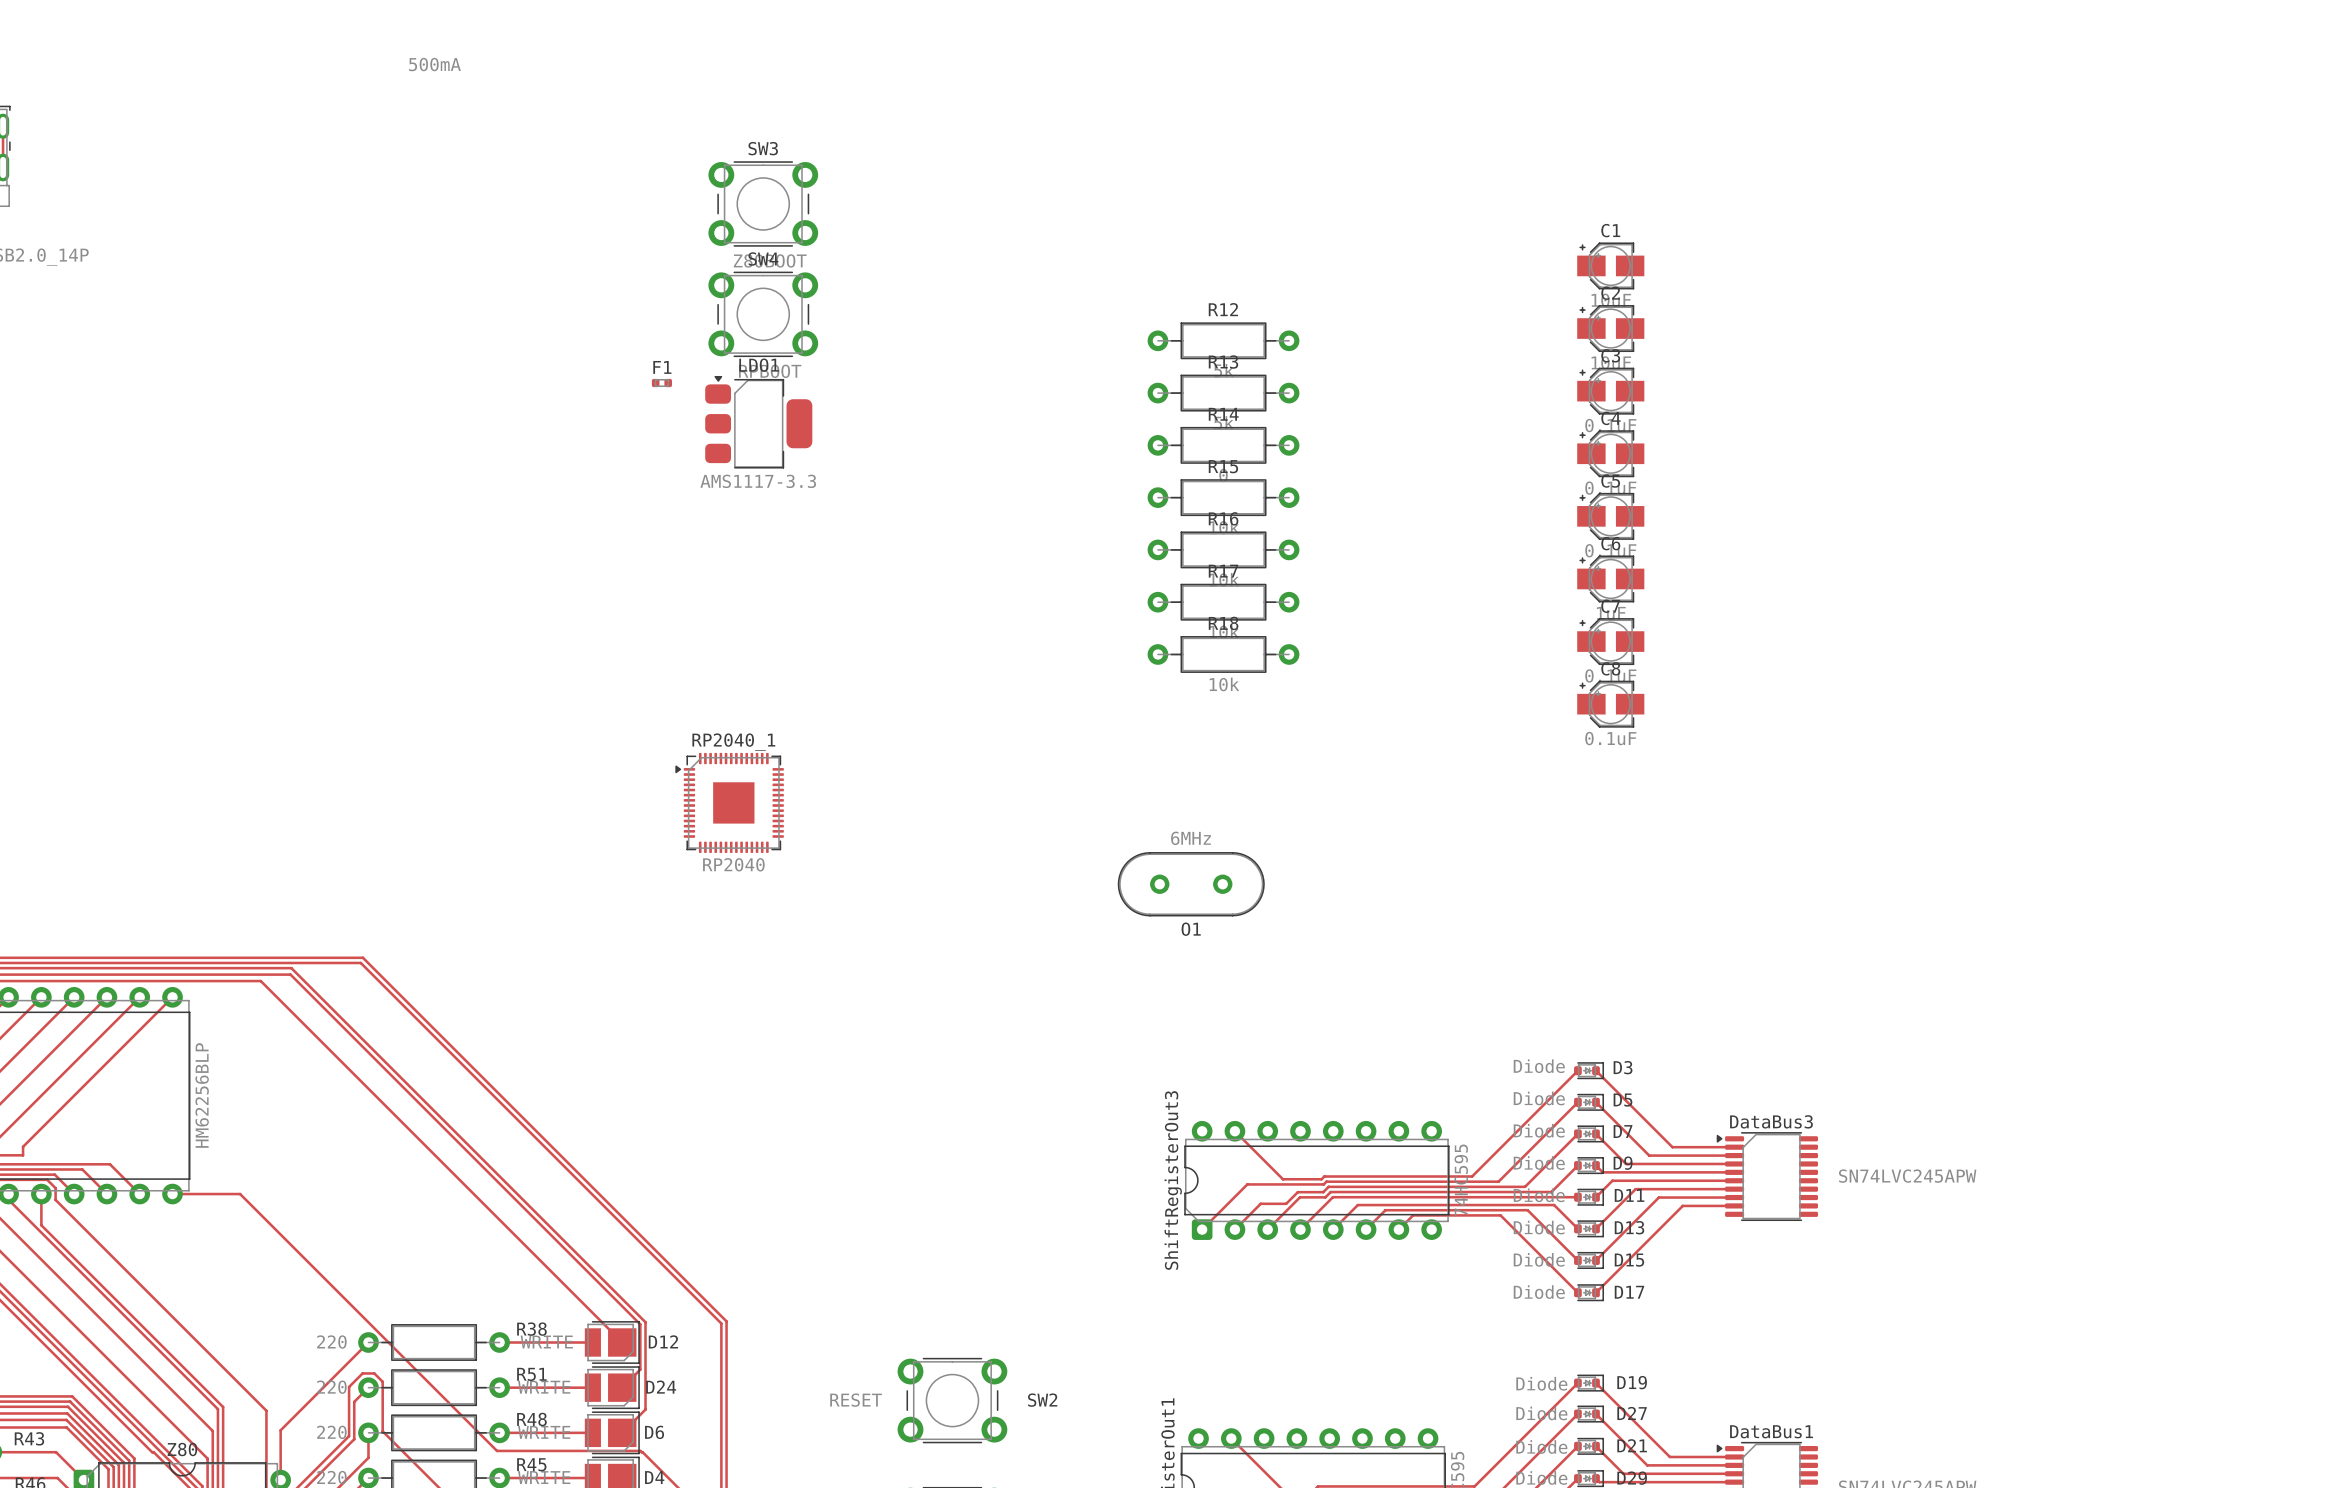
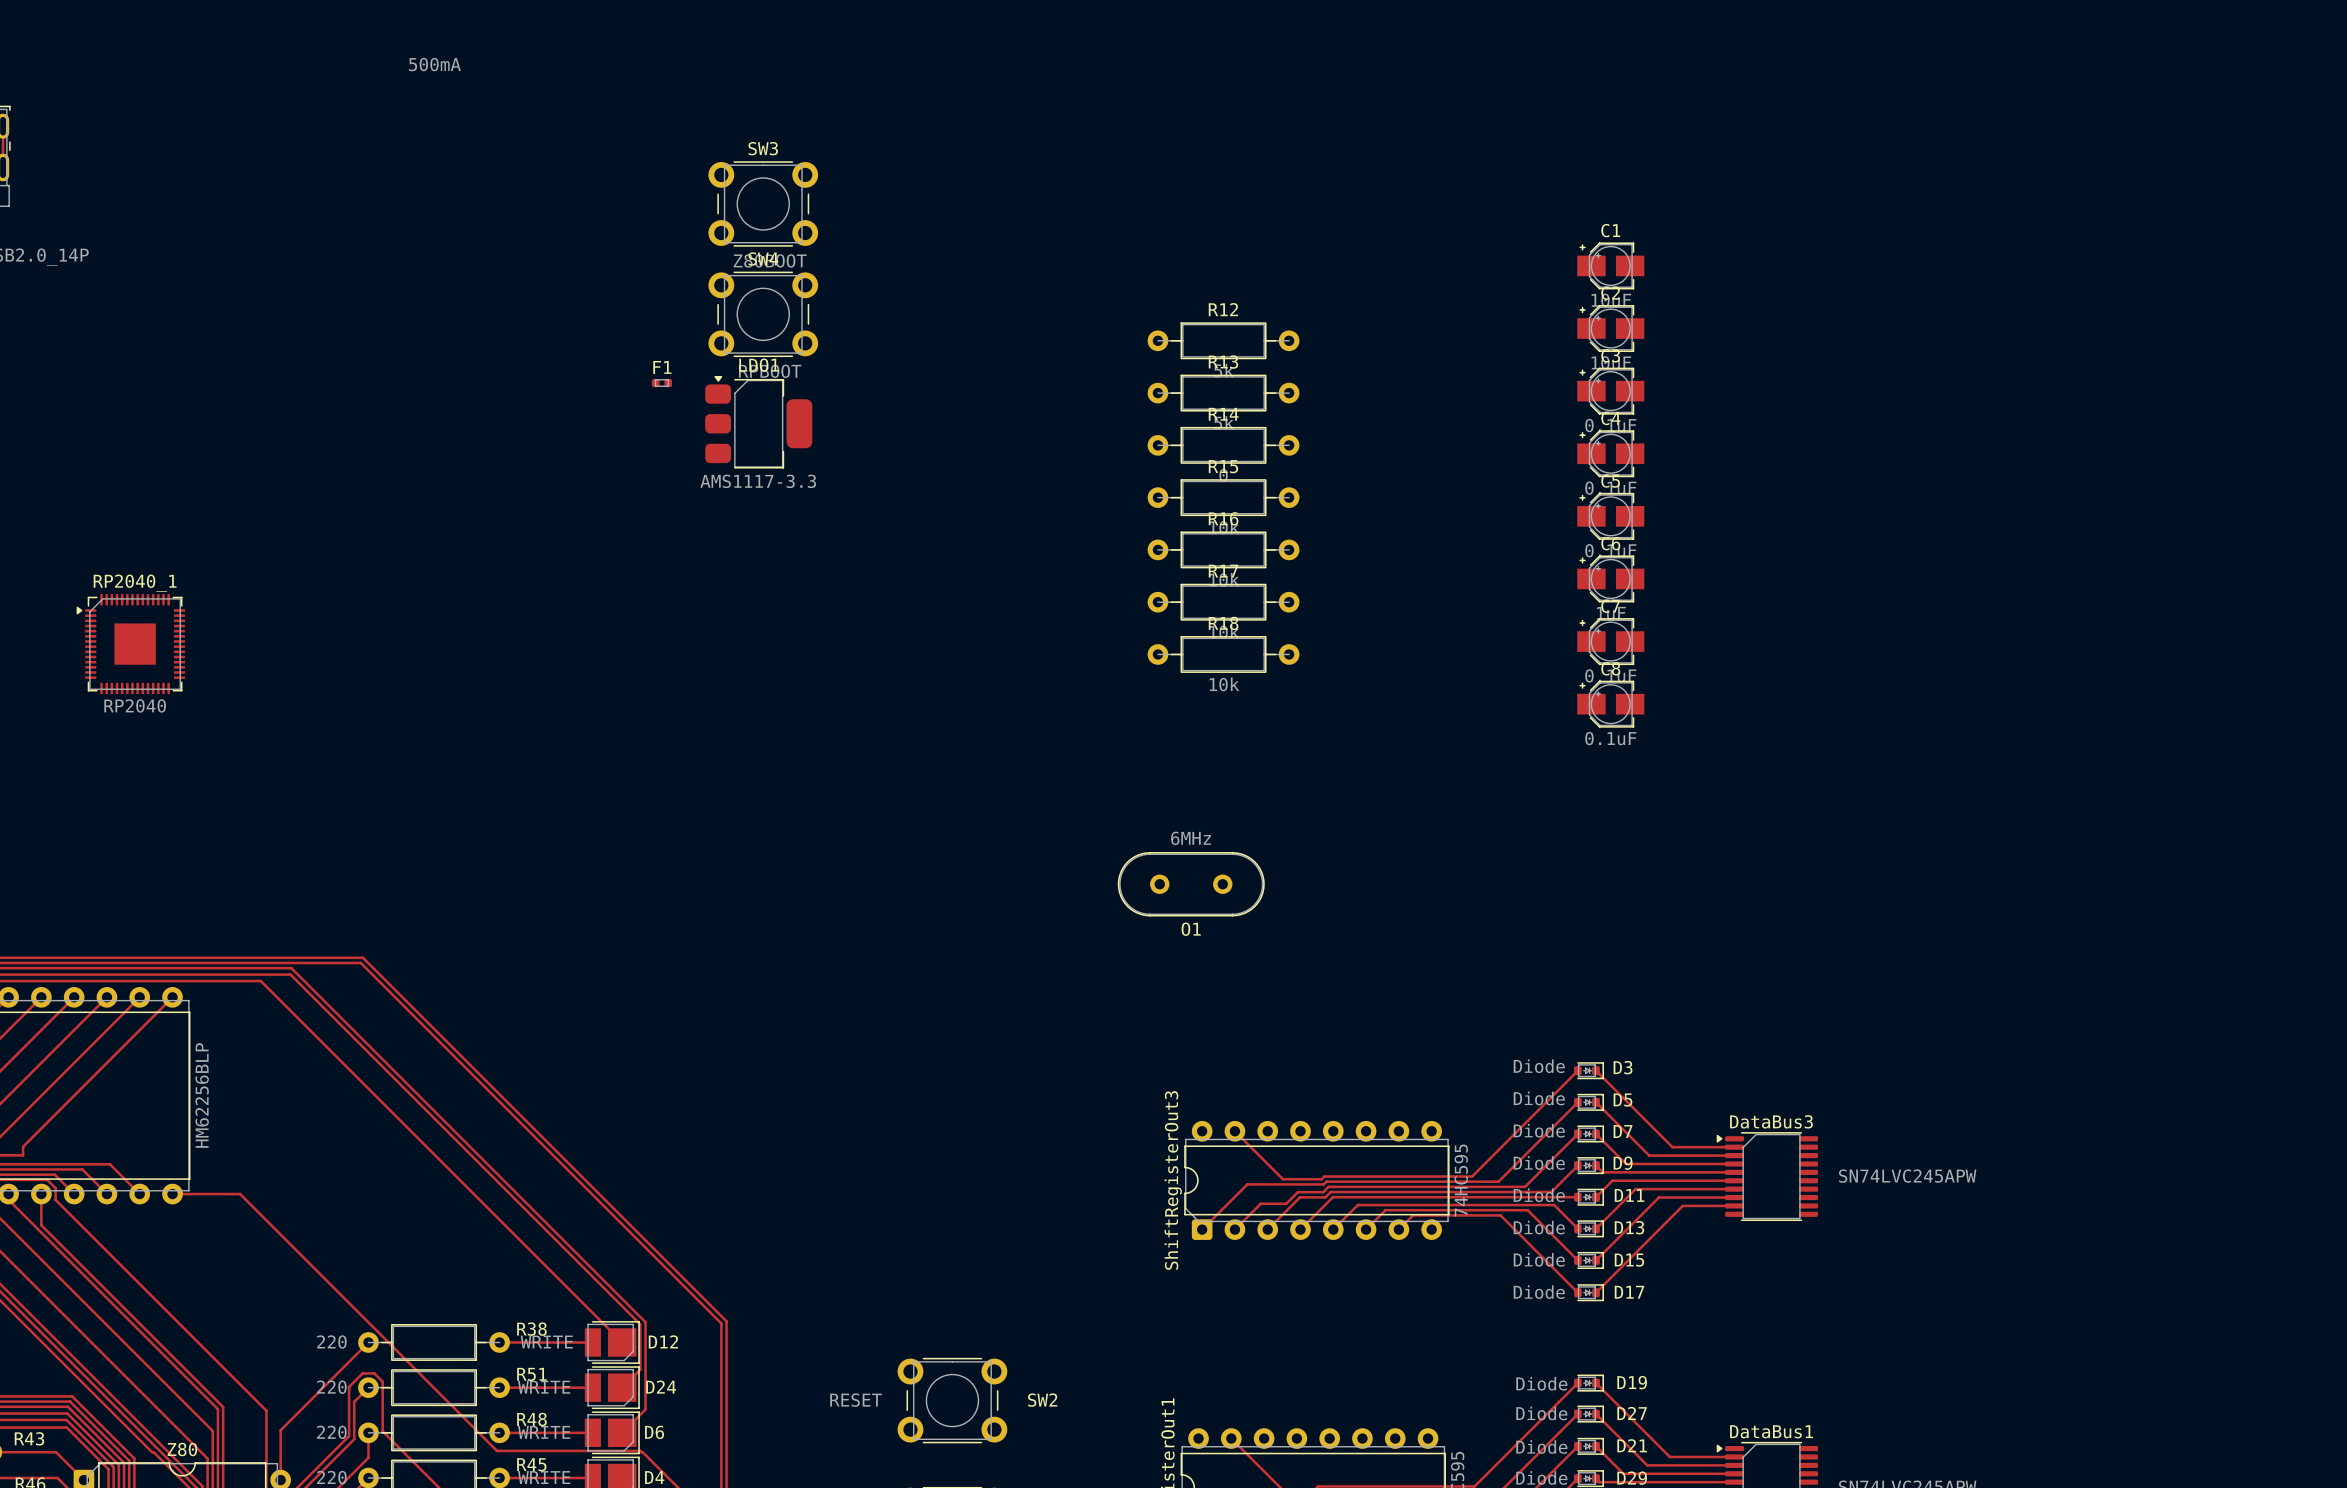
RP2040_1 position: (729, 802) -> (130, 644)

